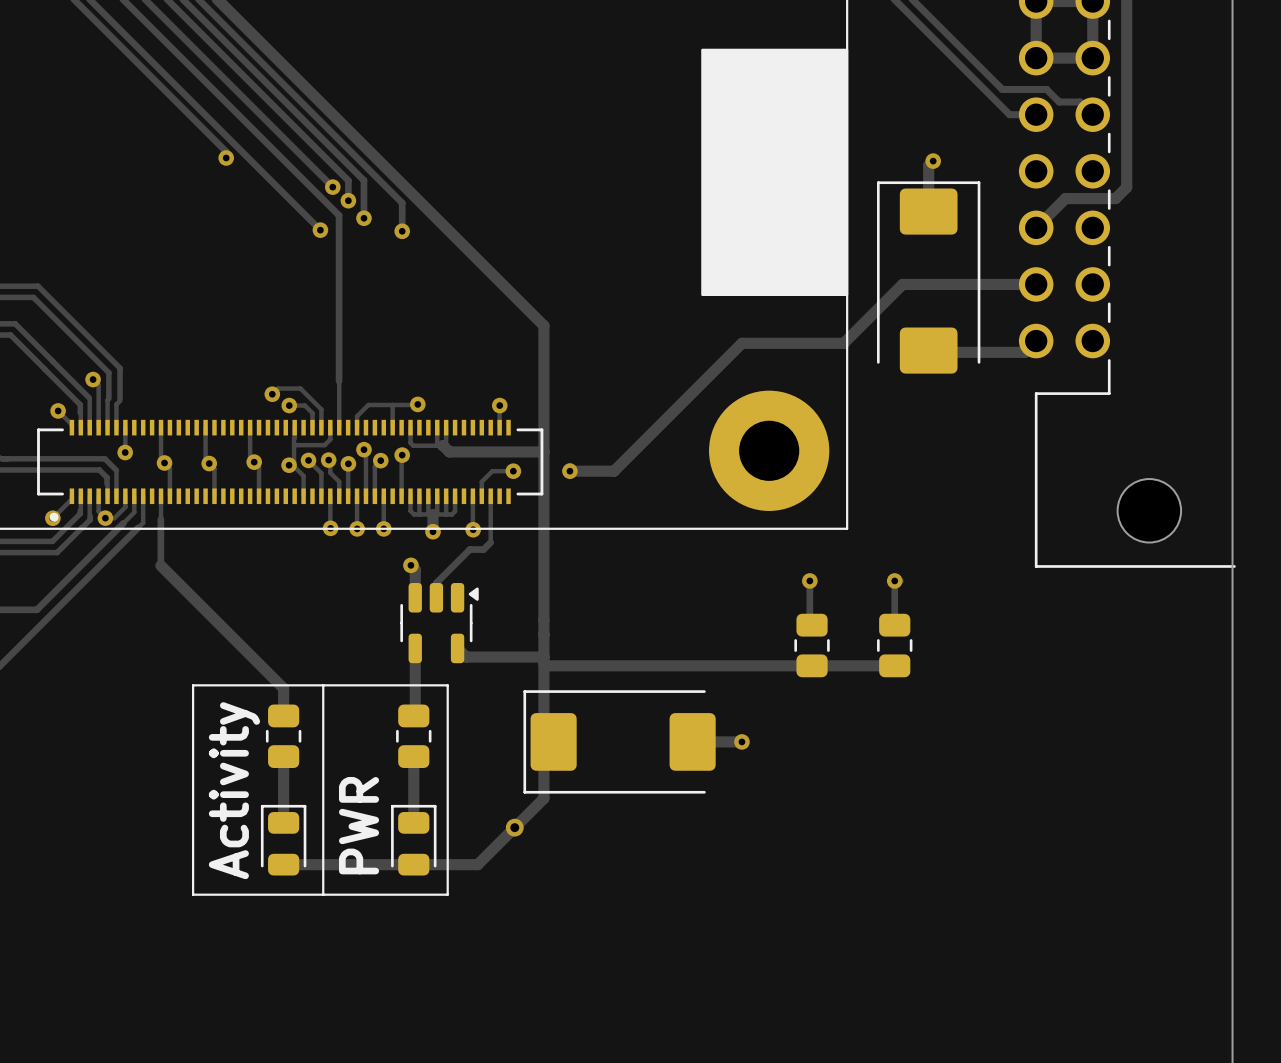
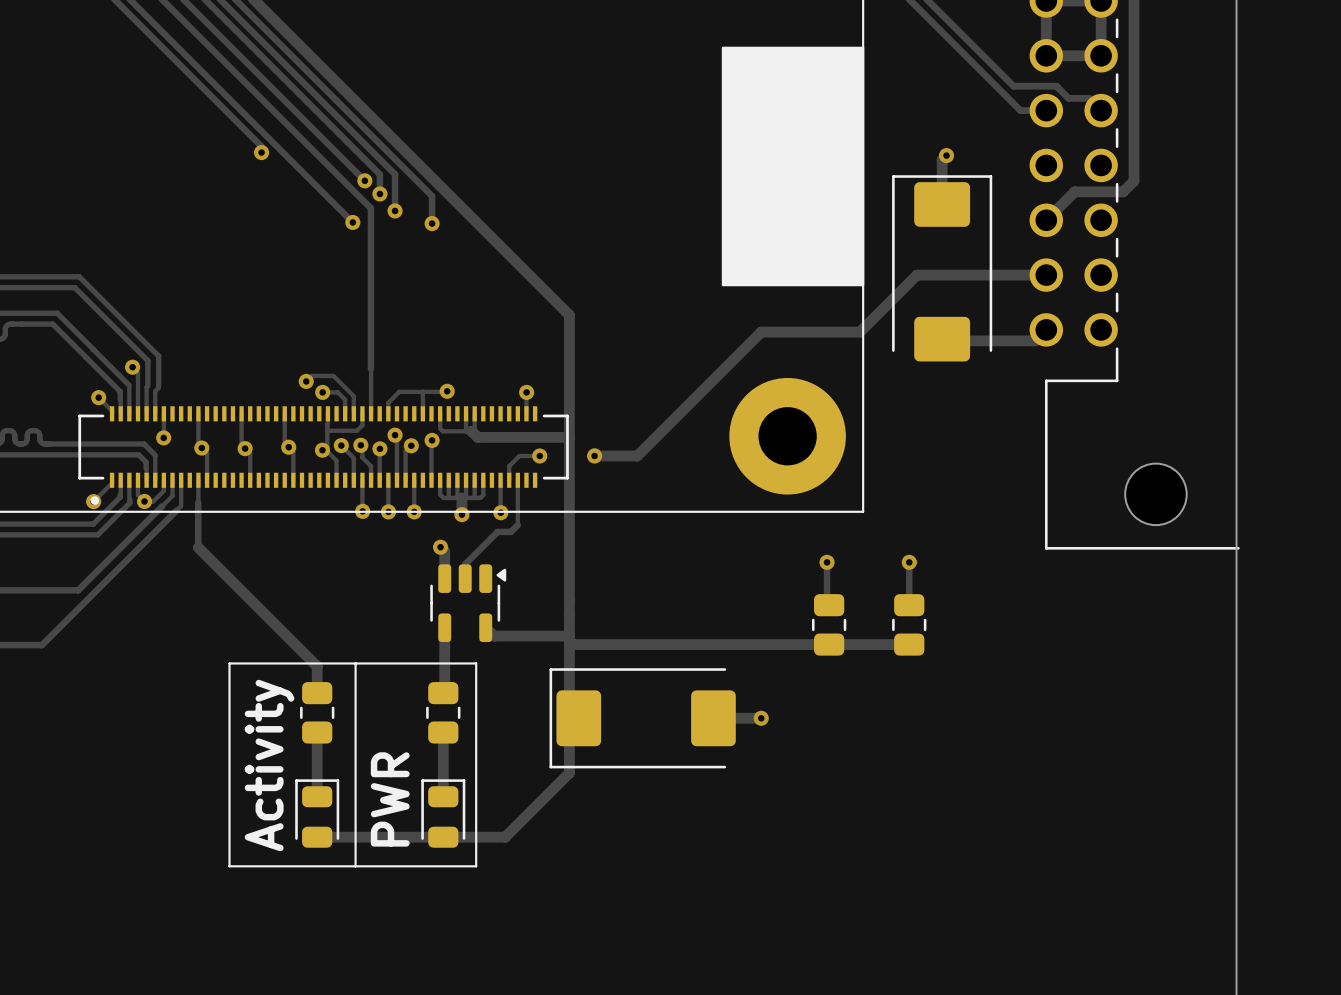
via: (514, 827) -> none

